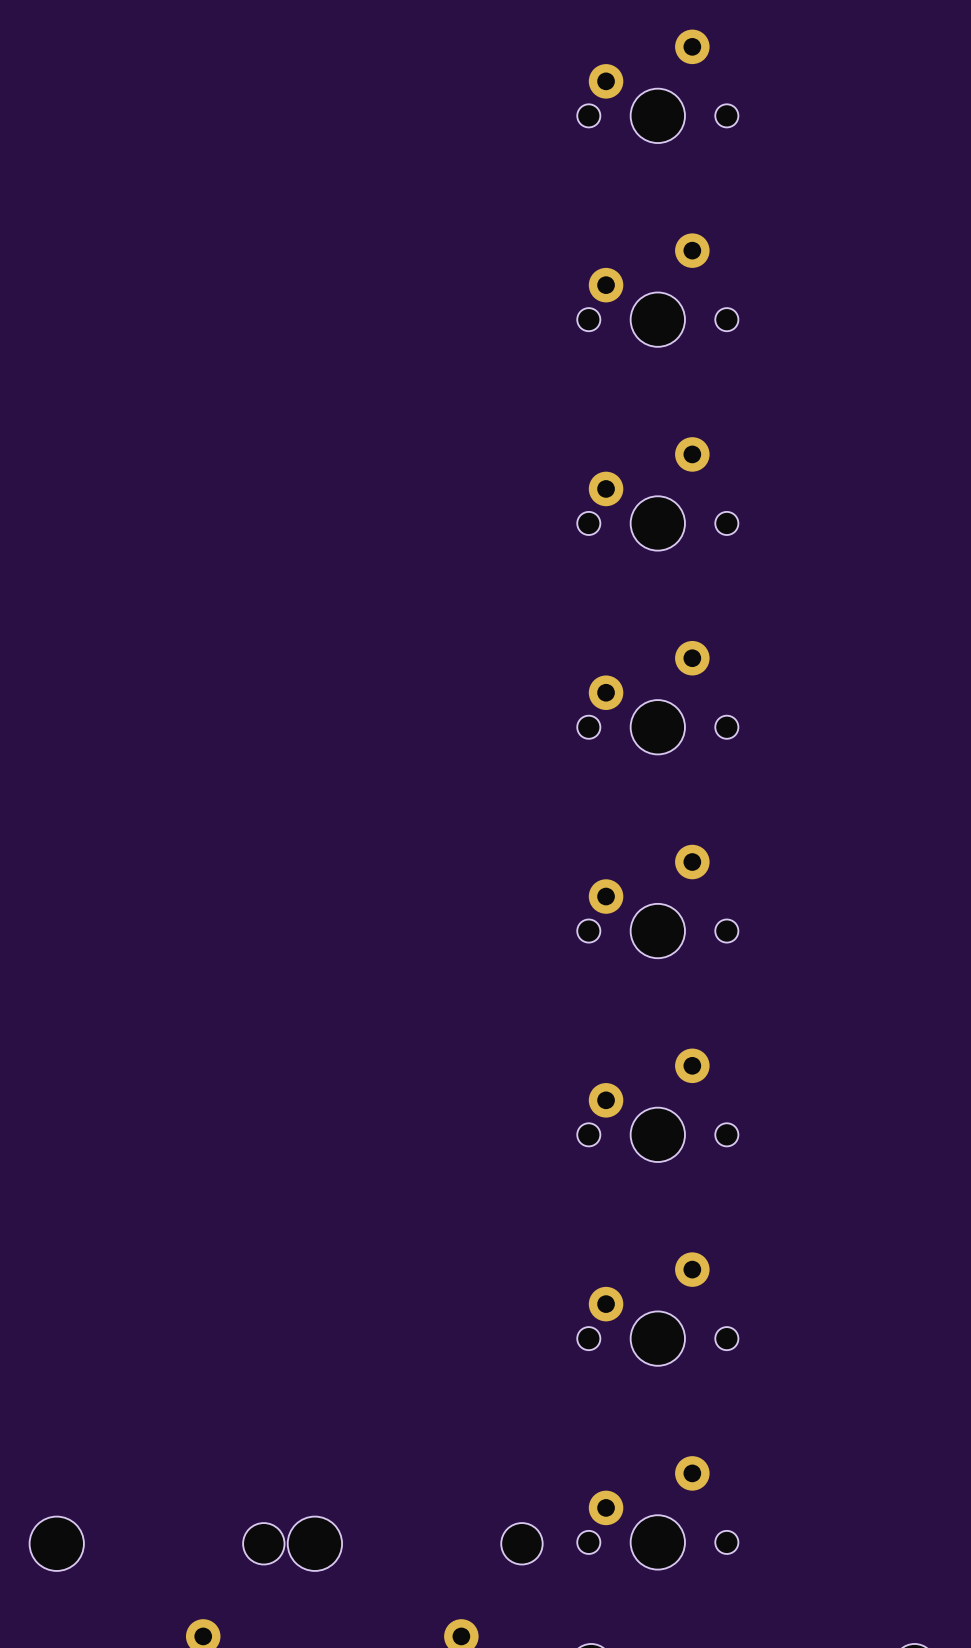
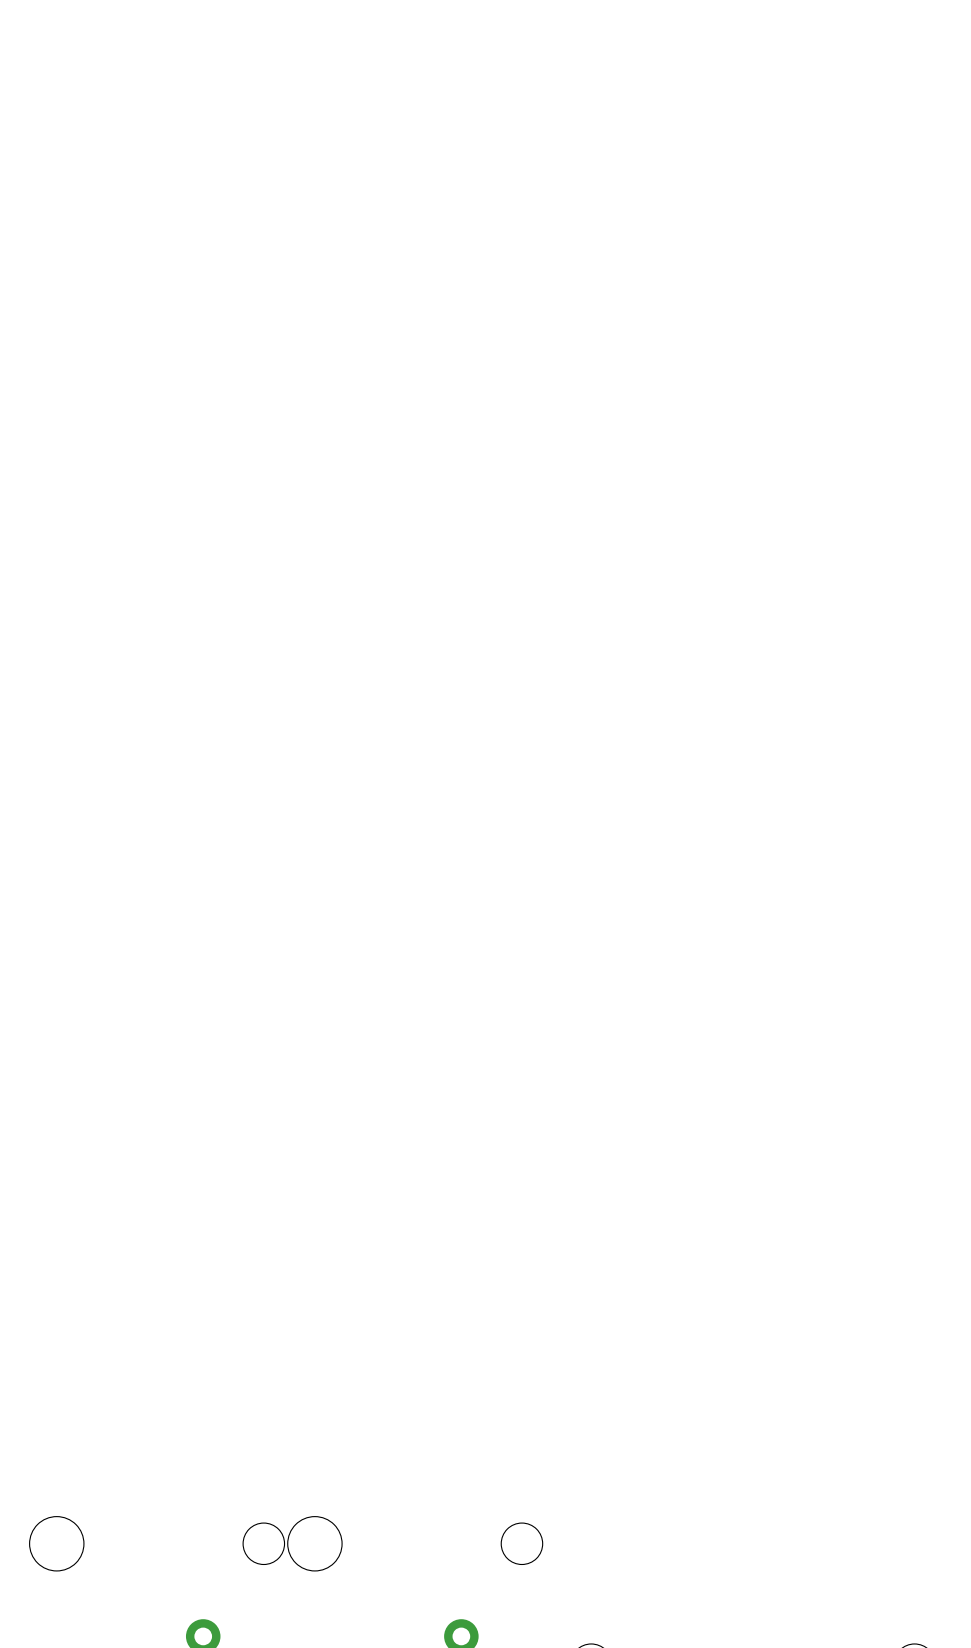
part: (657, 86) -> none
part: (657, 290) -> none
part: (657, 493) -> none
part: (657, 697) -> none
part: (657, 901) -> none
part: (657, 1105) -> none
part: (657, 1309) -> none
part: (657, 1512) -> none

